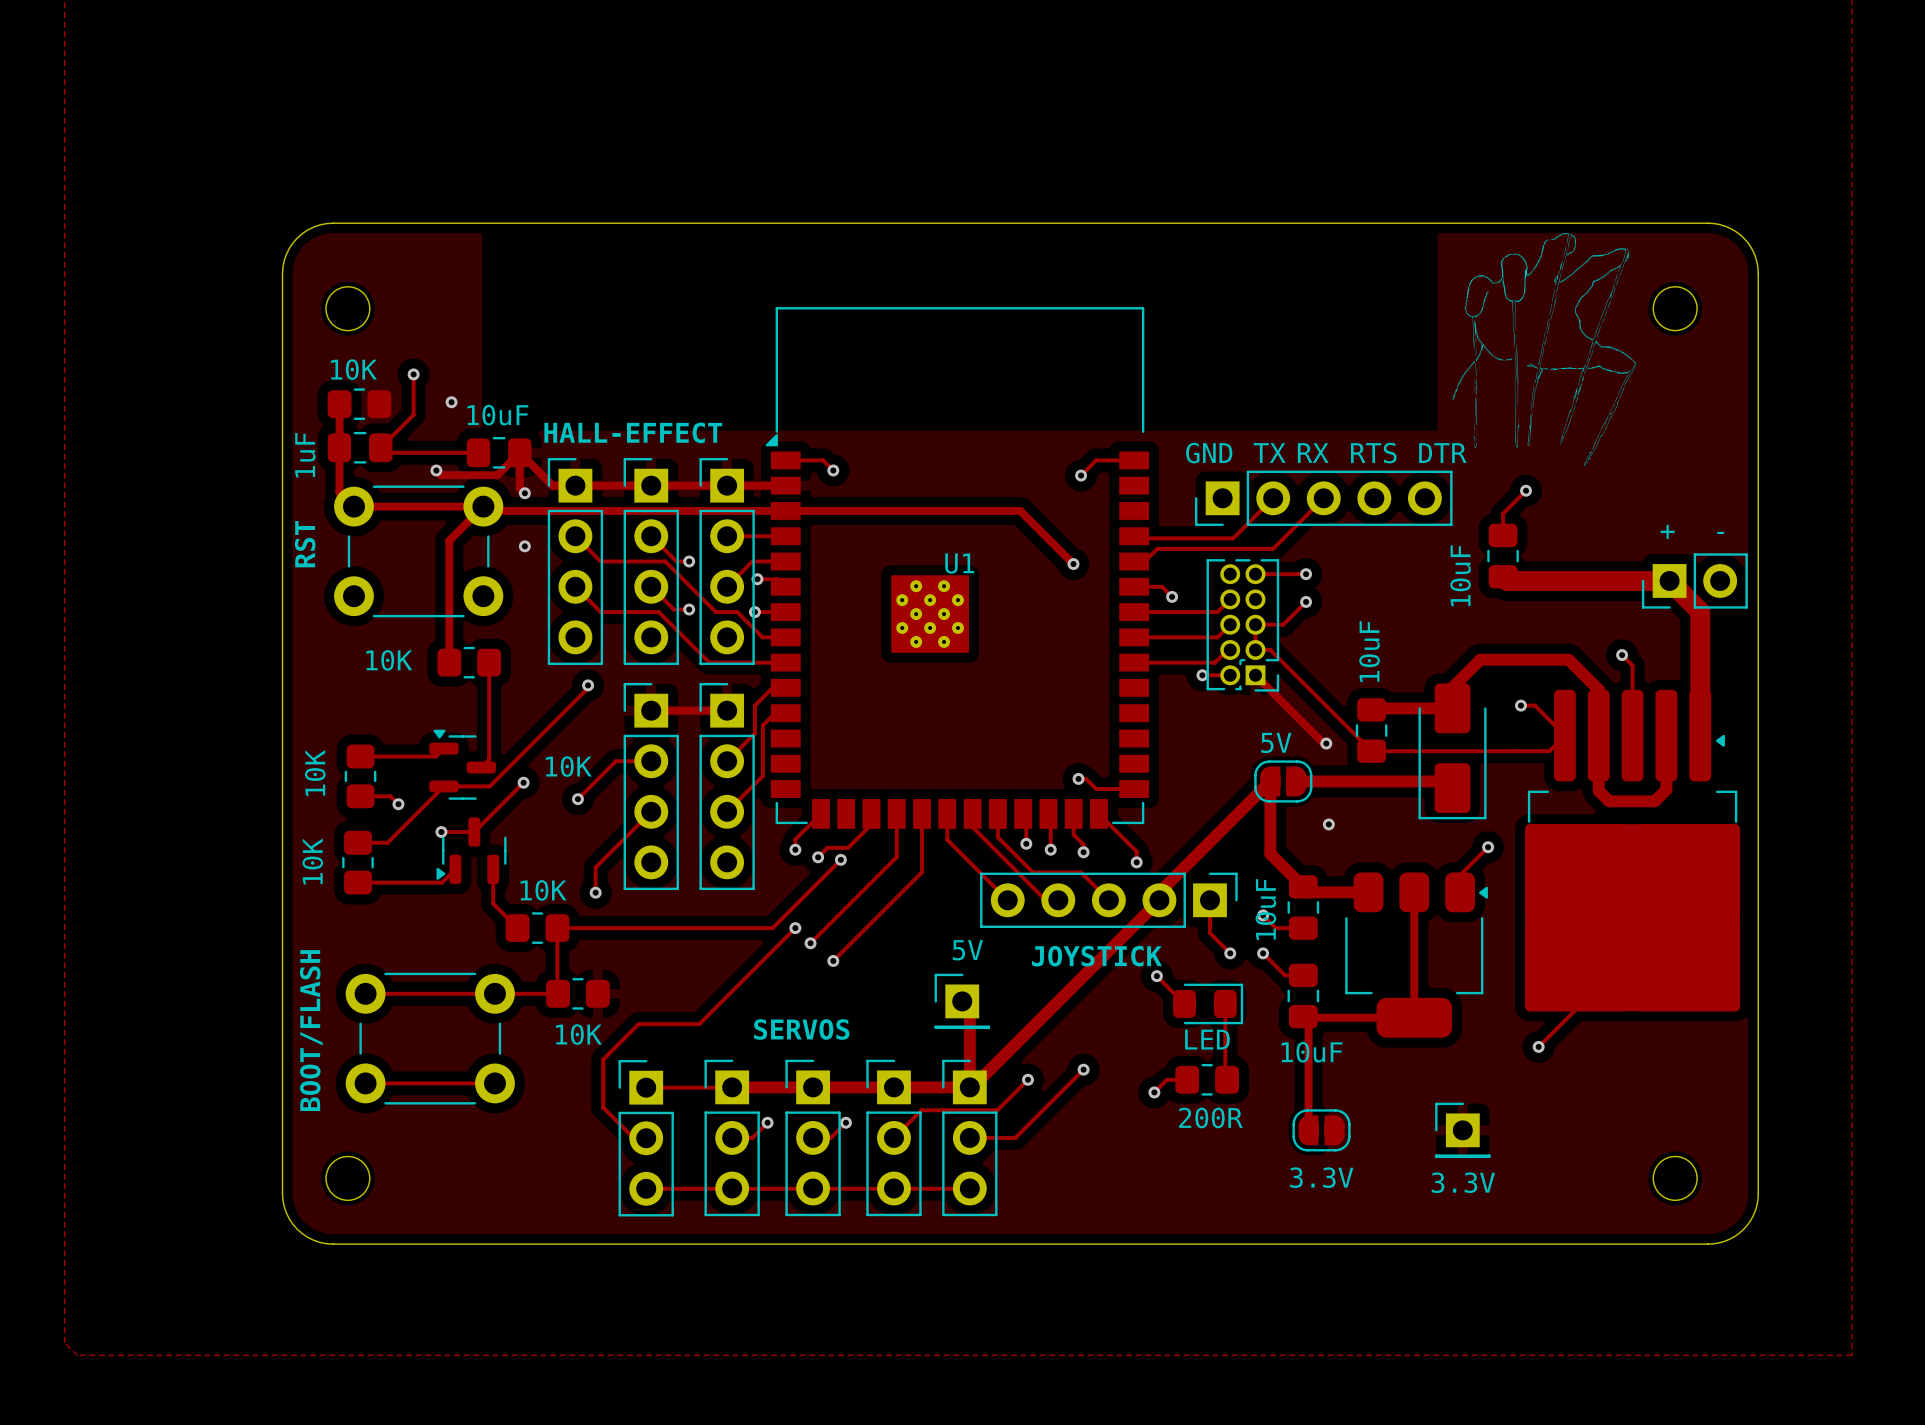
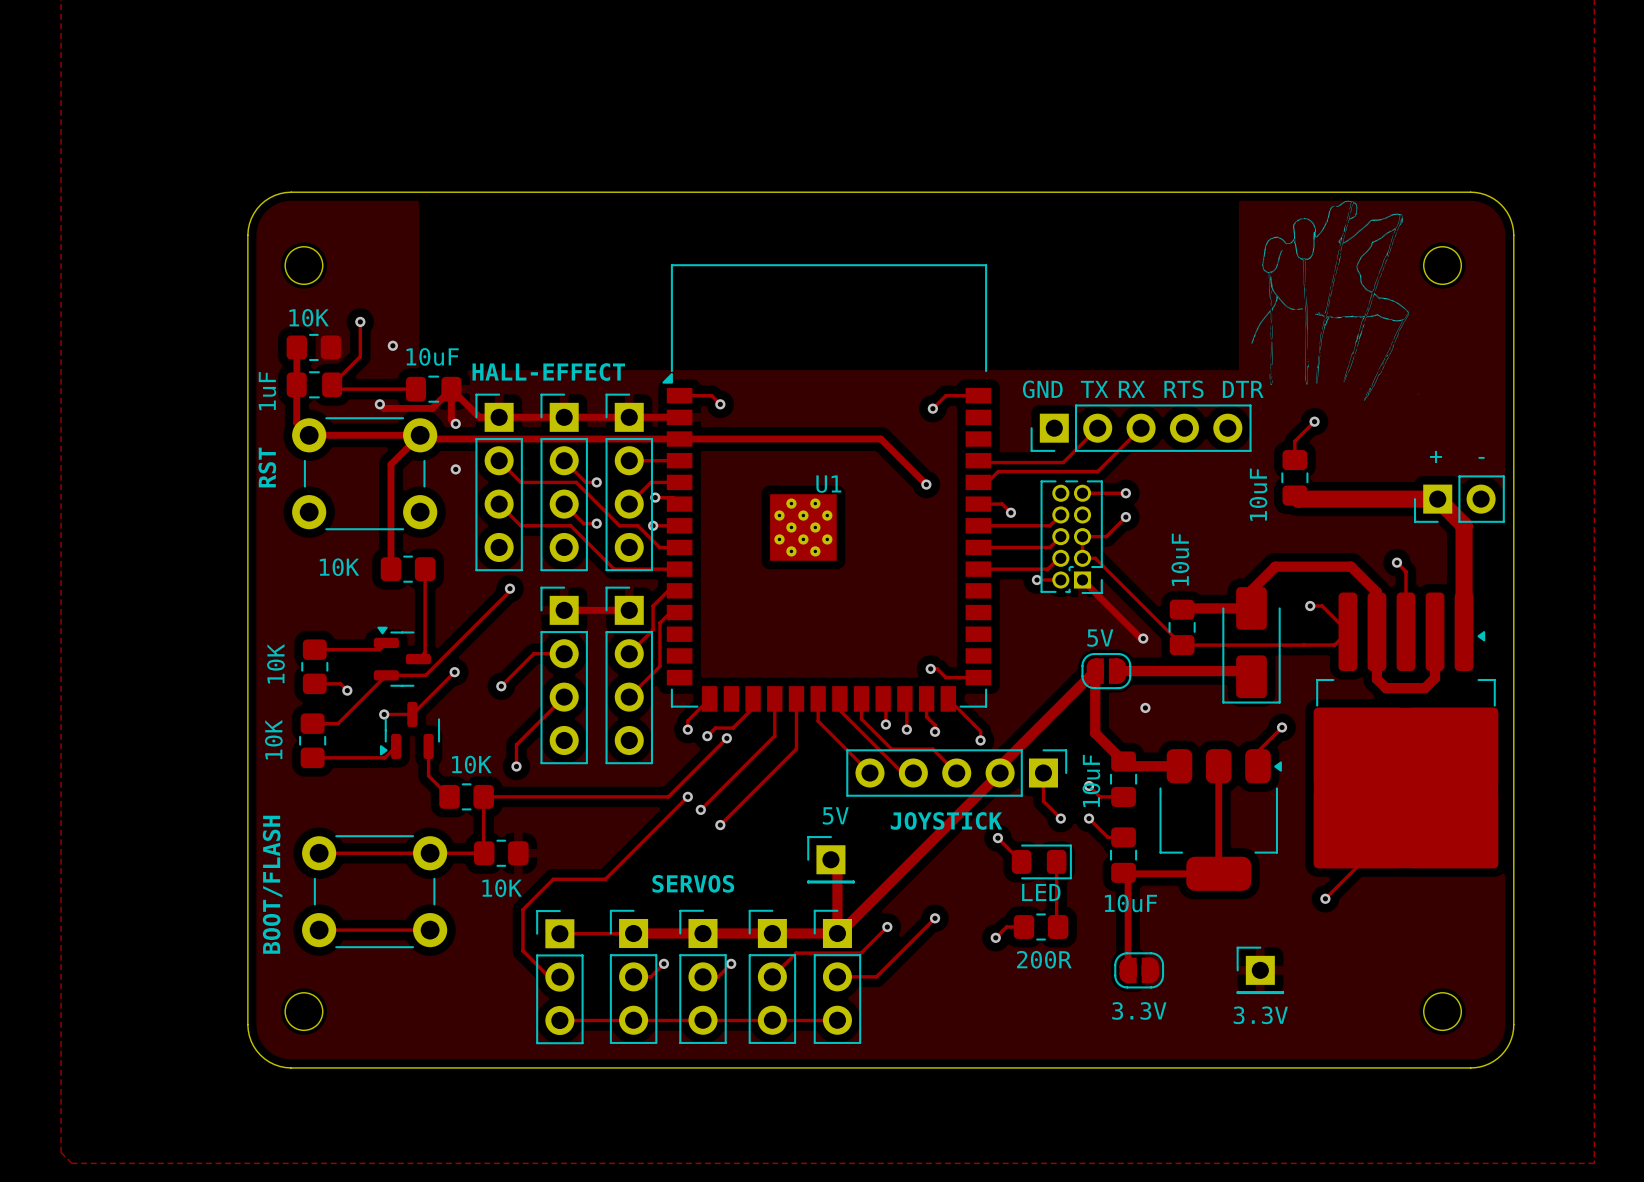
text: 10K (568, 766) -> none

